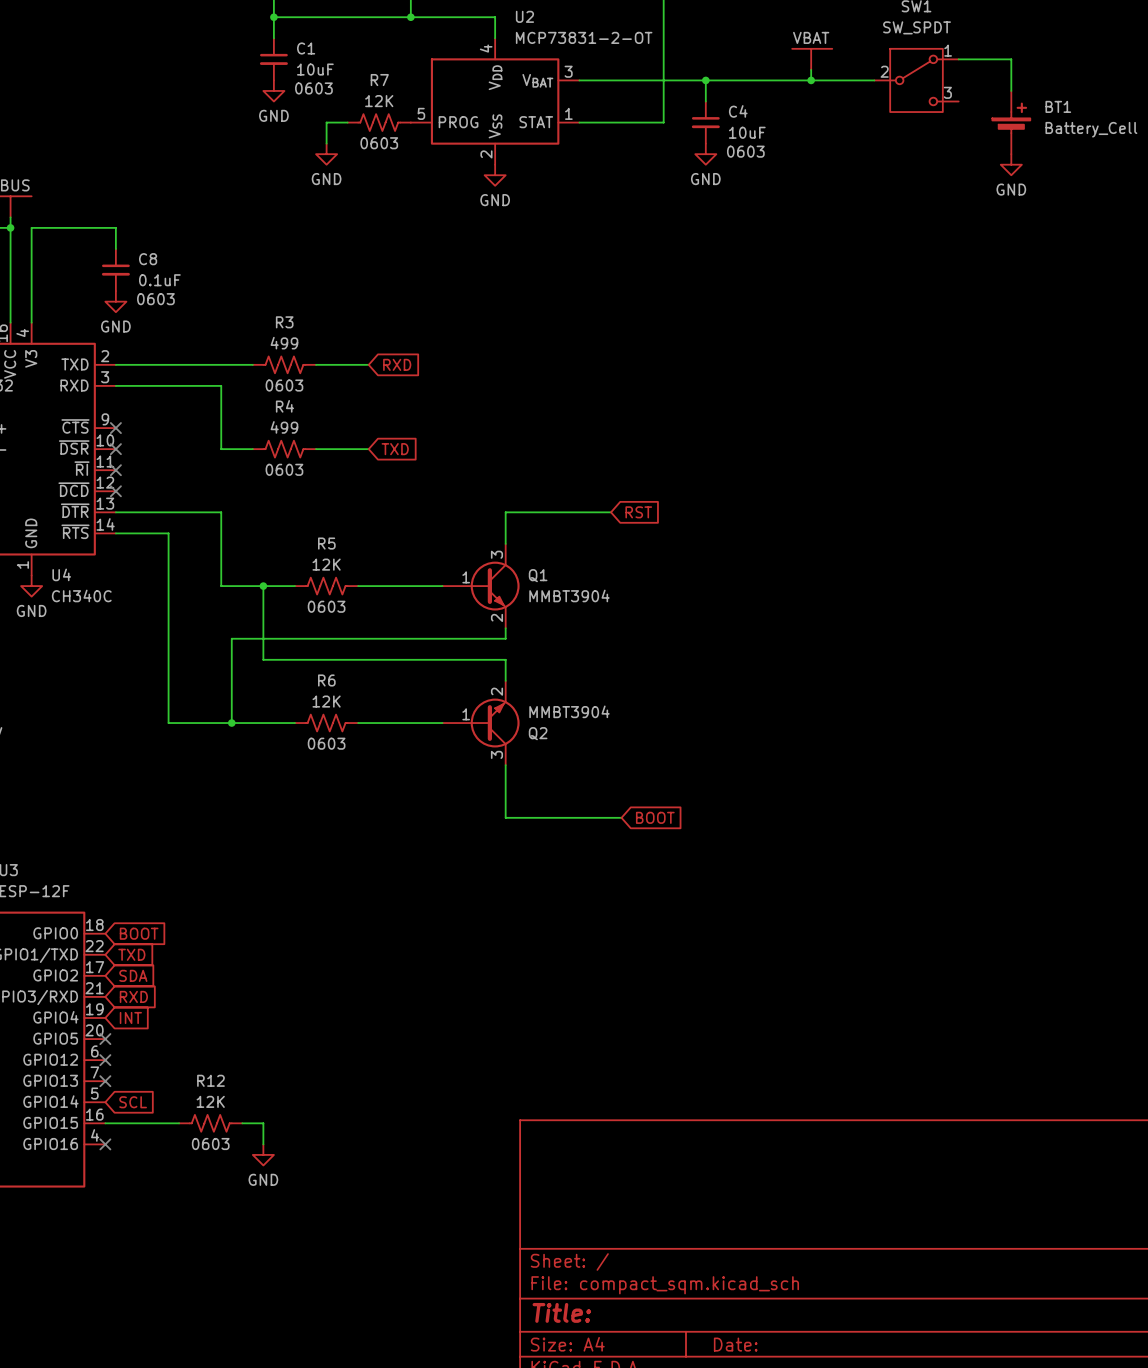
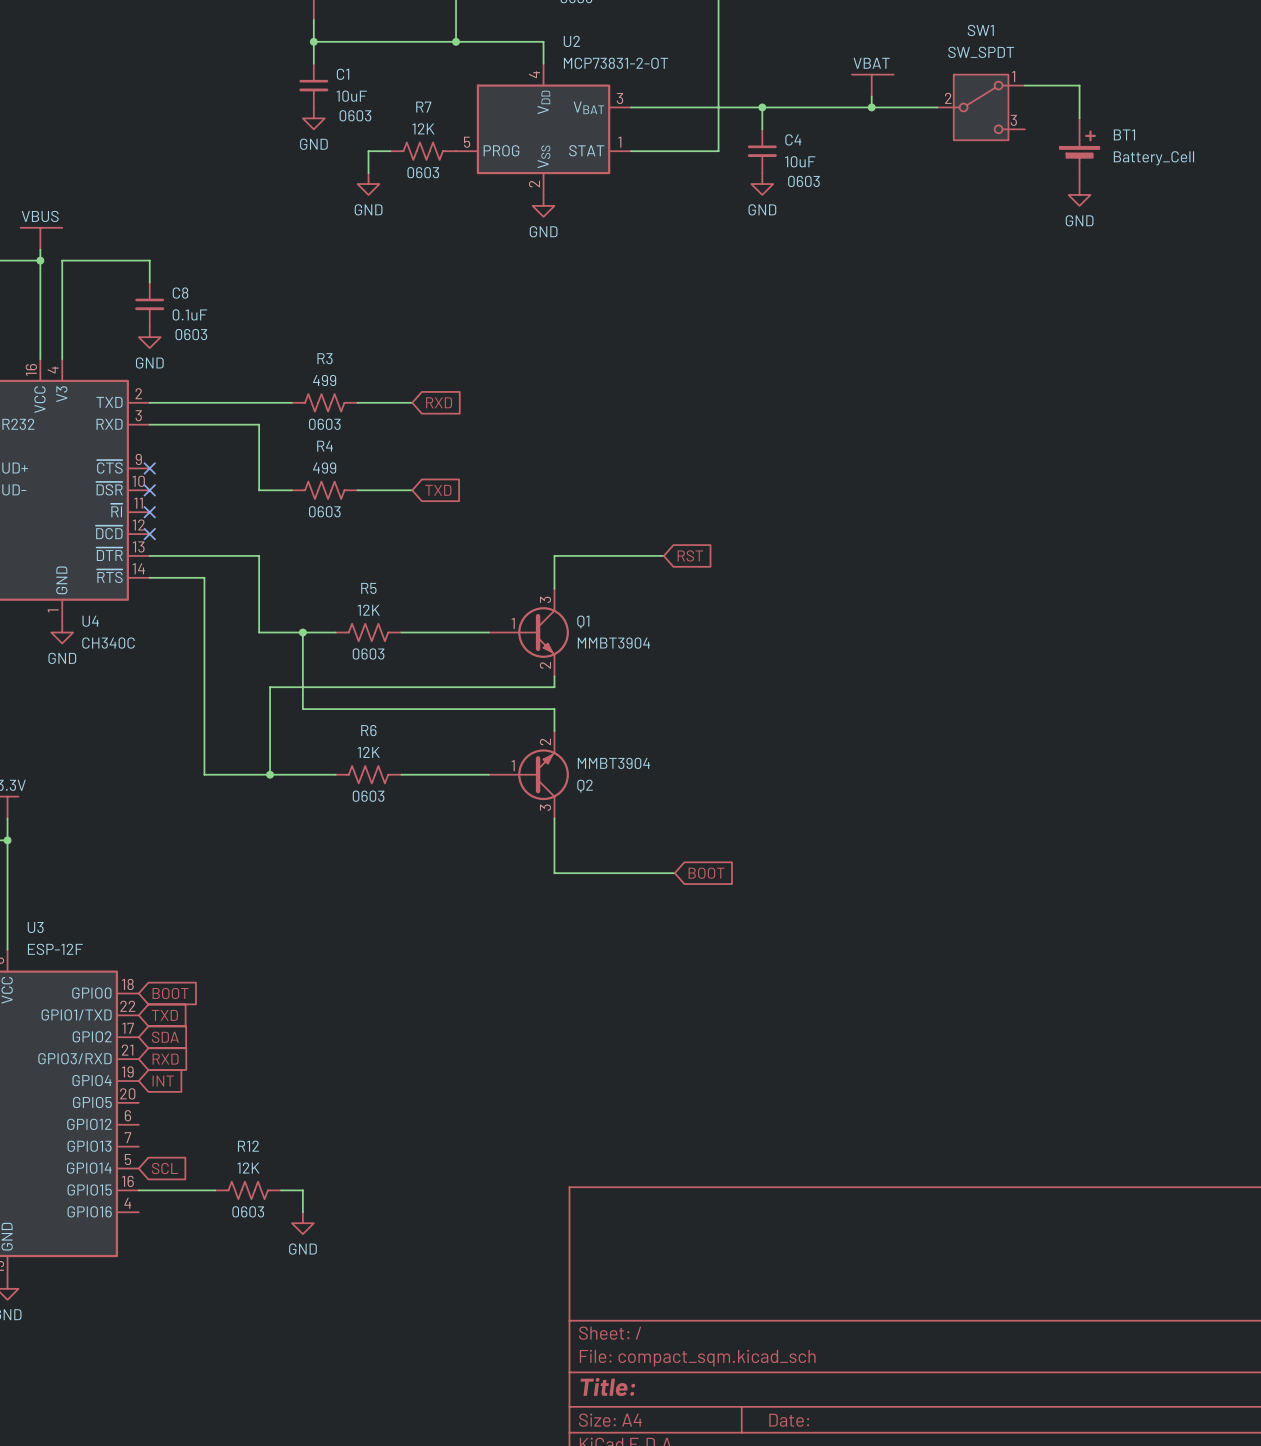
no-connect mark: (105, 1039) -> none
no-connect mark: (105, 1060) -> none
no-connect mark: (105, 1081) -> none
no-connect mark: (105, 1144) -> none

